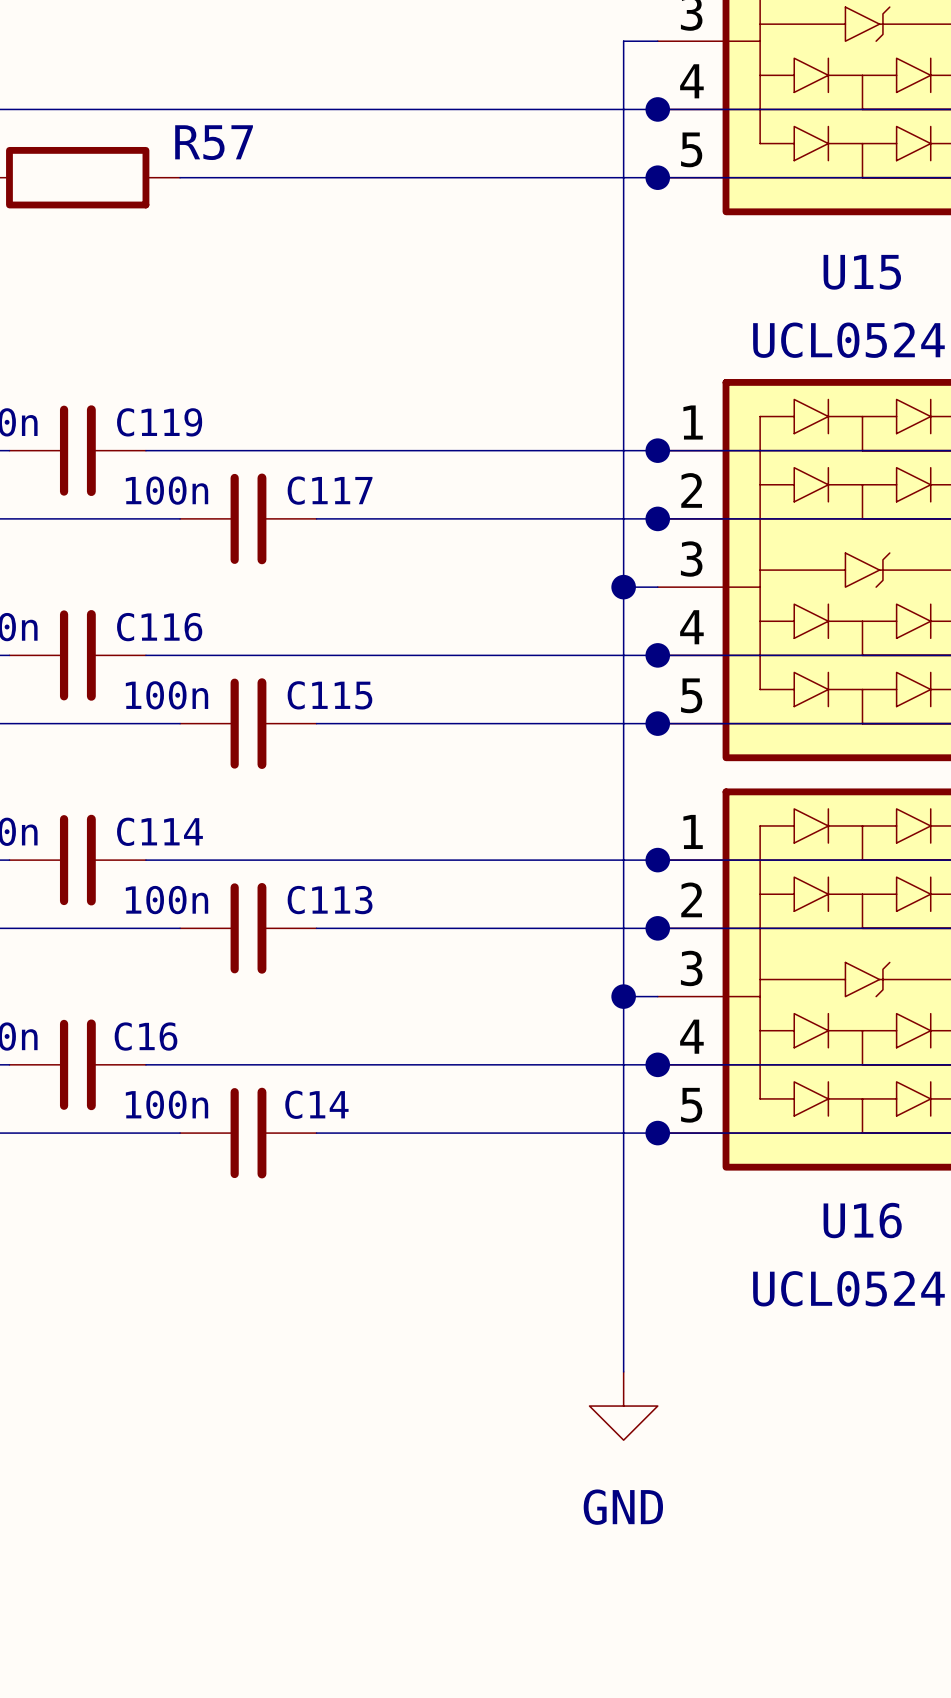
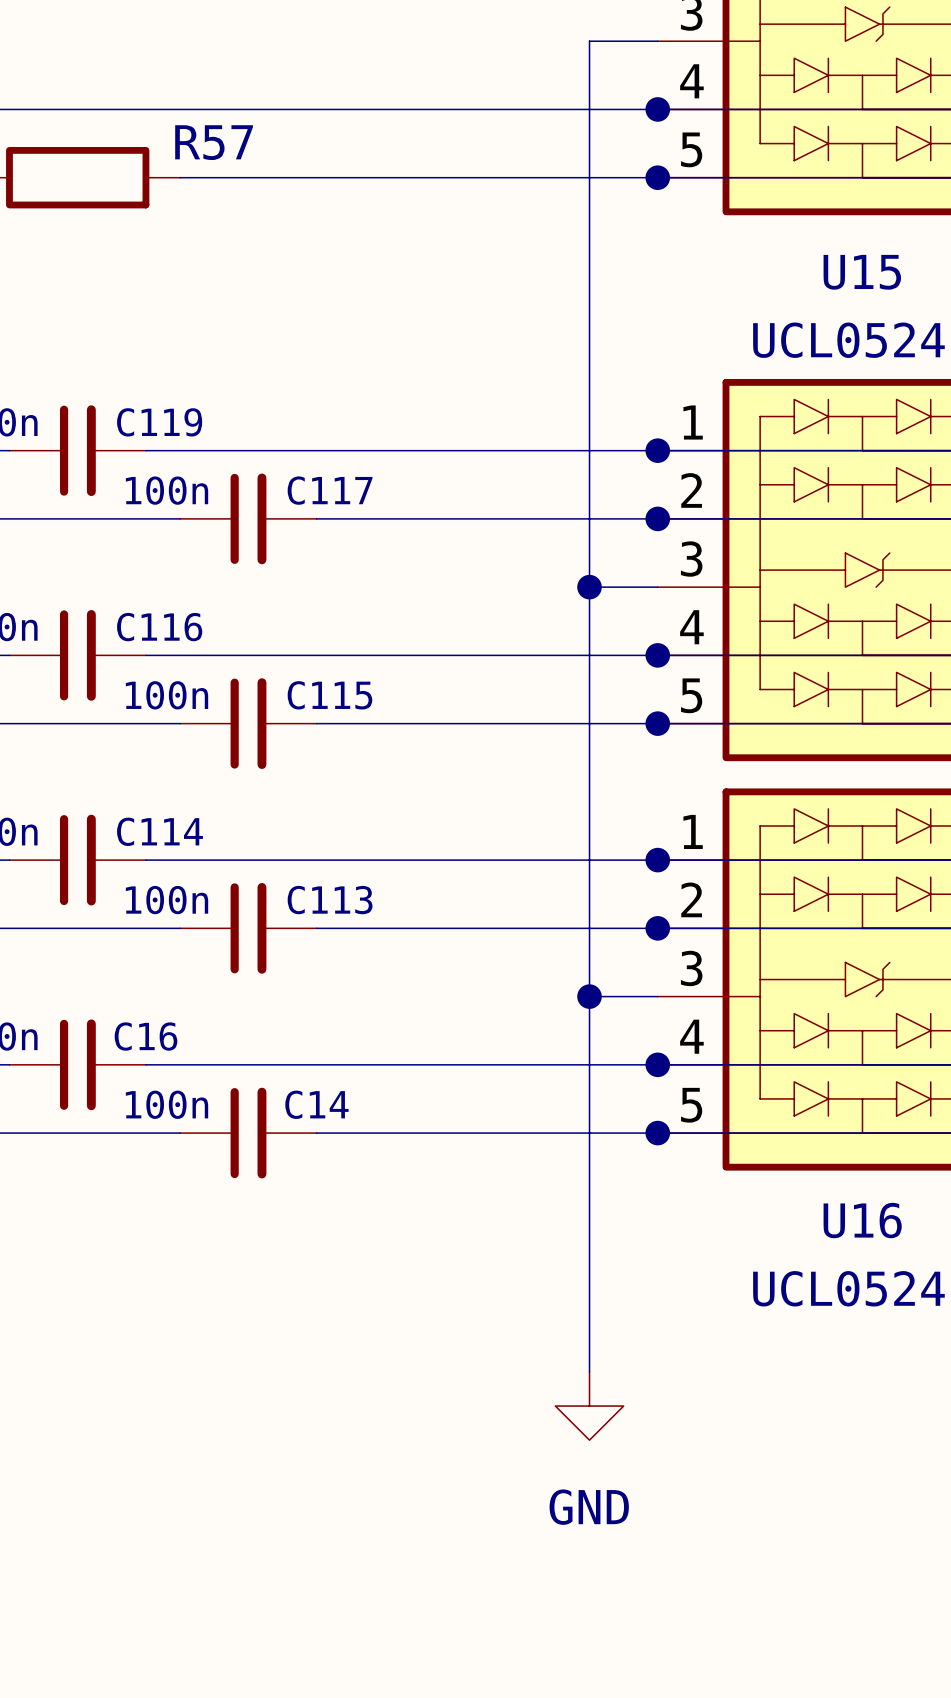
wire: (623, 41) (623, 1371) -> (623, 41) (589, 41) (589, 1371)
wire: none -> (589, 587) (623, 587)
junction position: (623, 587) -> (589, 587)
wire: none -> (589, 996) (623, 996)
junction position: (623, 996) -> (589, 996)
power symbol position: GND (623, 1406) -> GND (589, 1406)

